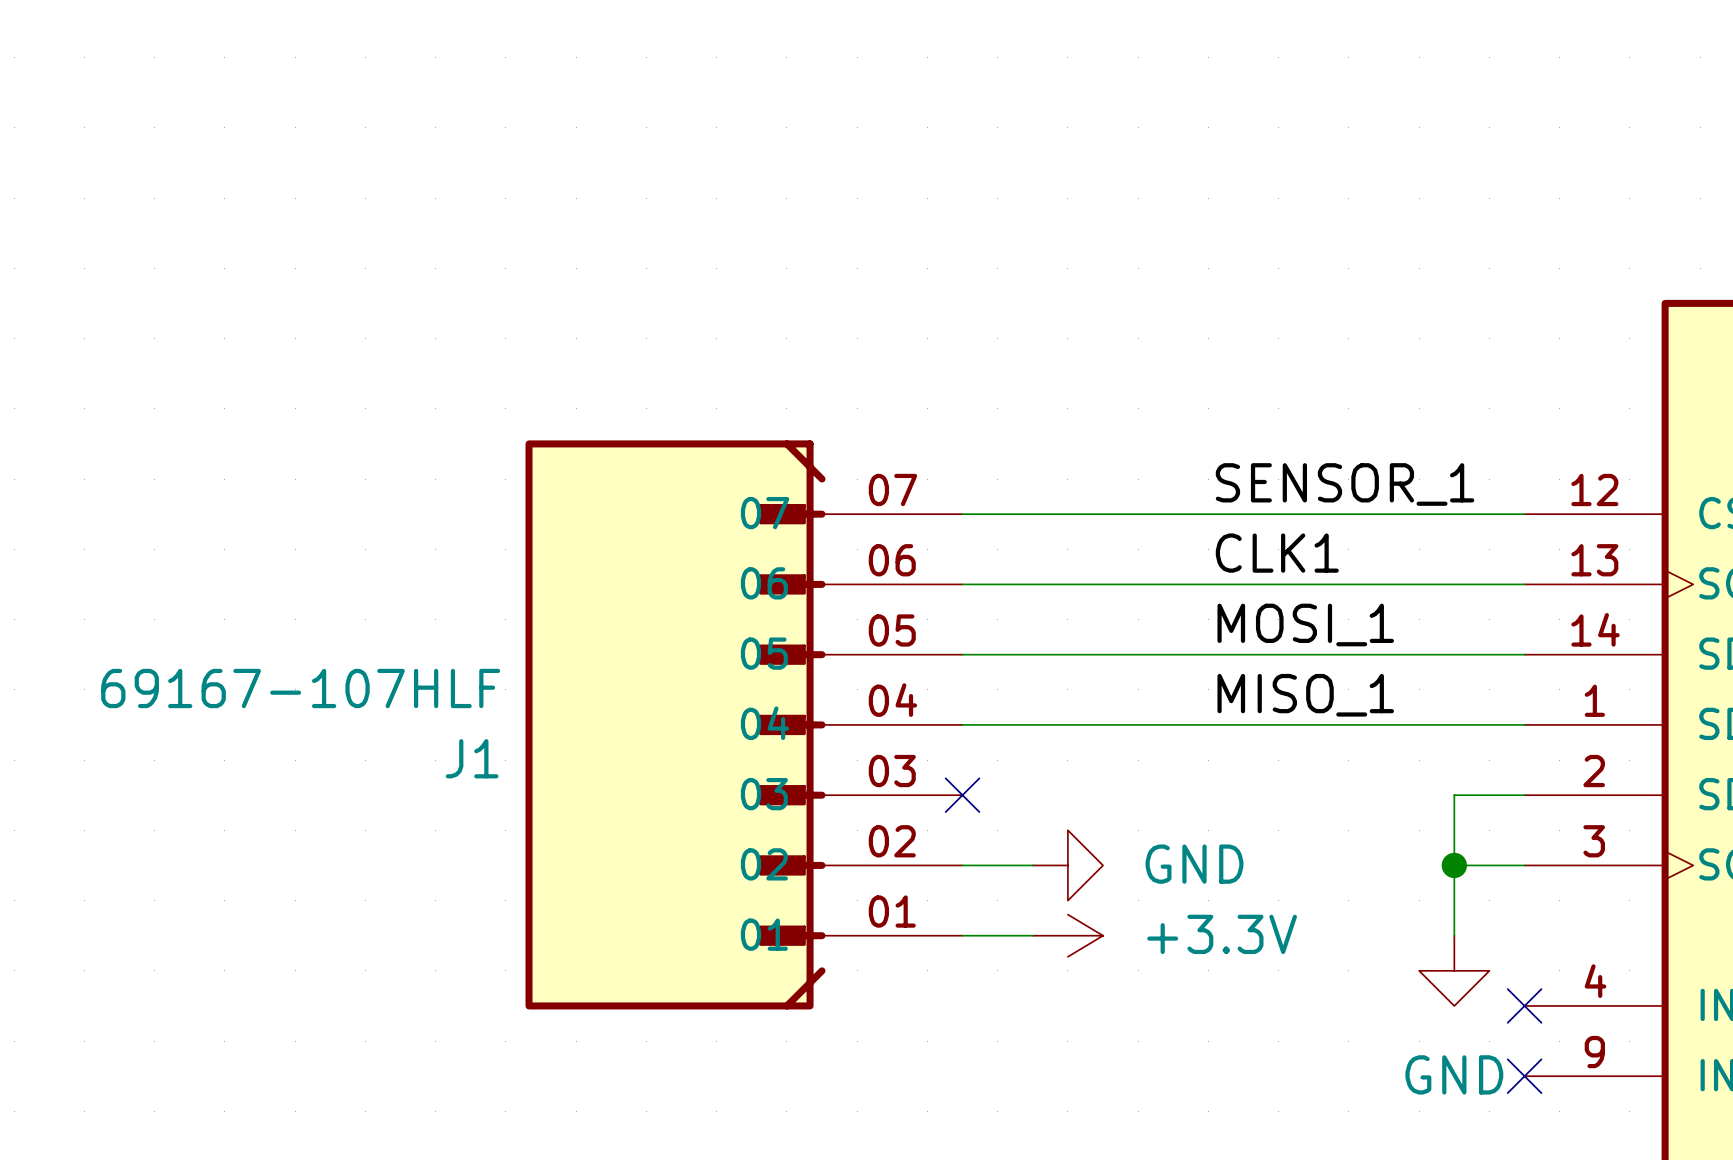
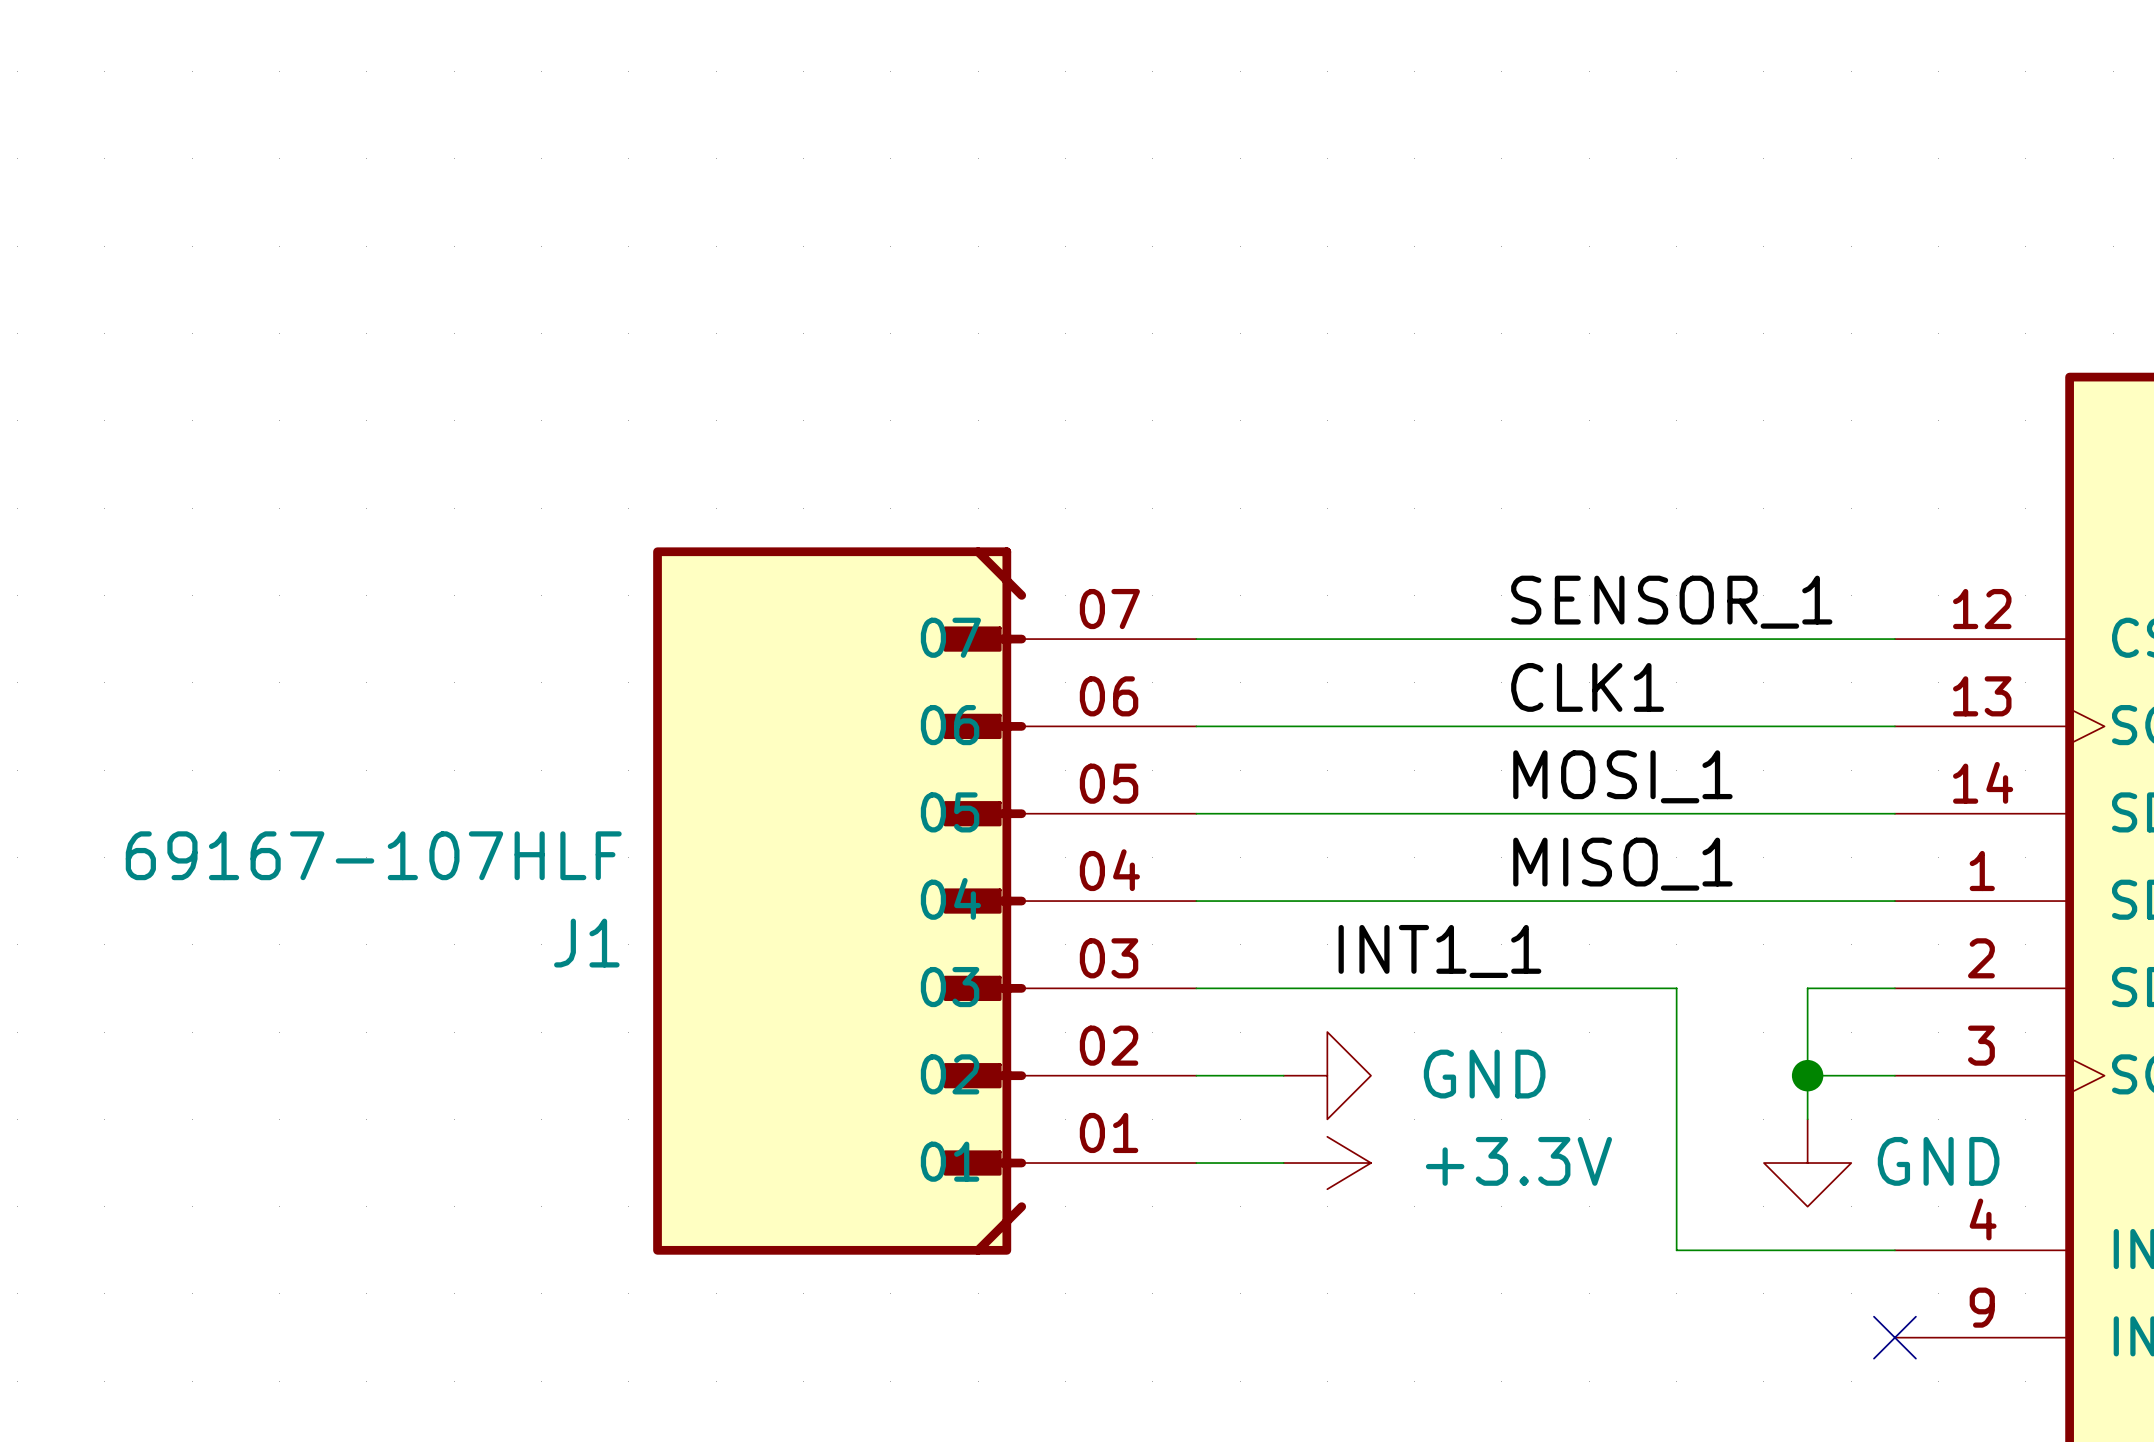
label: none -> INT1_1 (1439, 951)
wire: none -> (1196, 988) (1676, 988) (1676, 1250) (1894, 1250)
no-connect mark: (962, 795) -> none
power symbol position: GND (1454, 970) -> GND (1807, 1163)
no-connect mark: (1524, 1005) -> none
power symbol text position: GND (1454, 1074) -> GND (1938, 1161)

